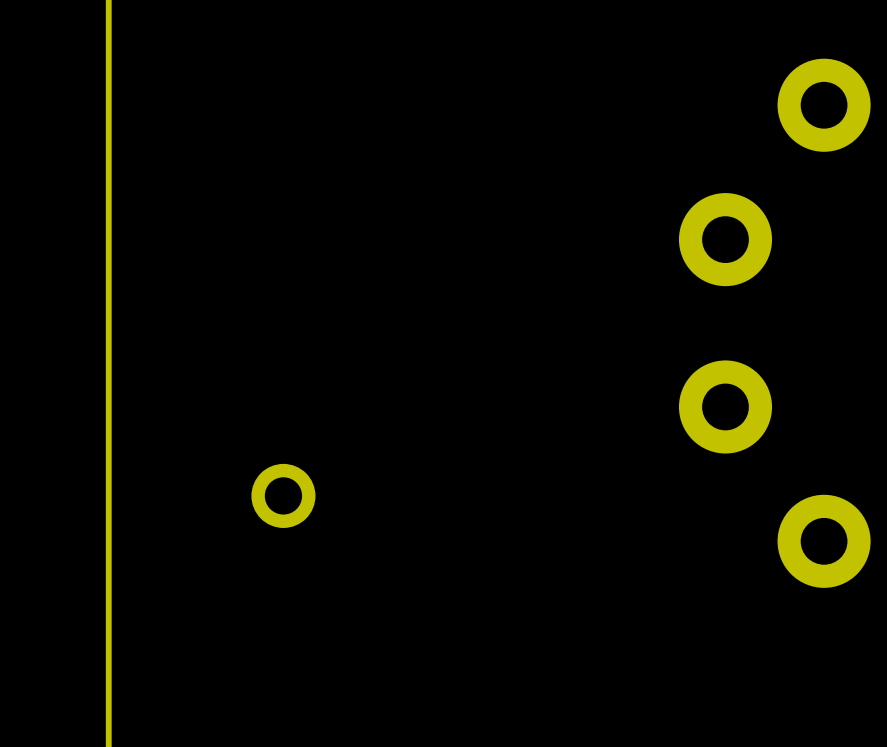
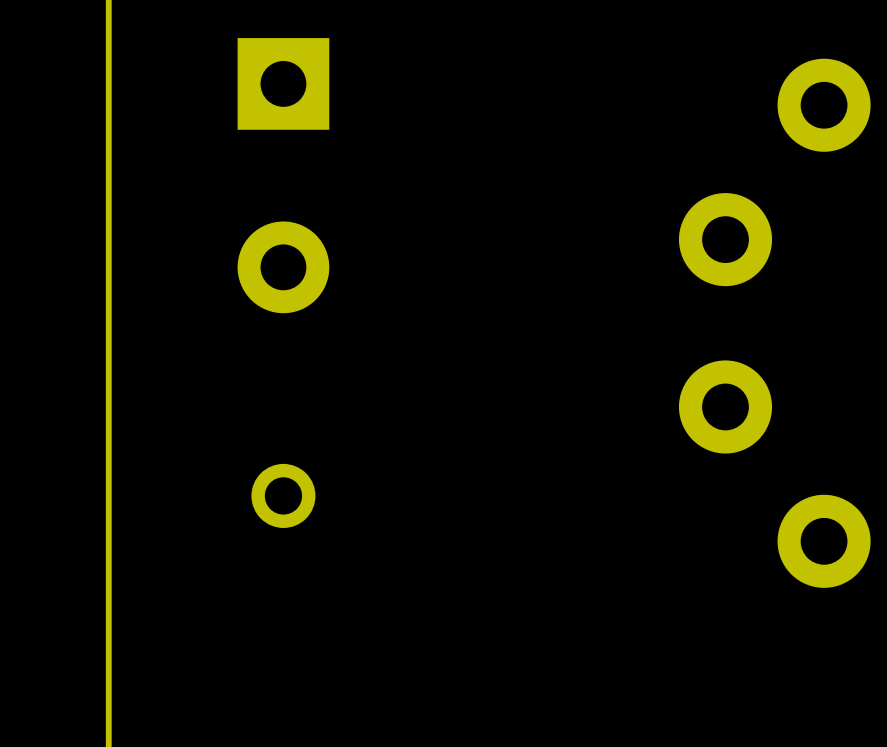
part: none -> (283, 175)

